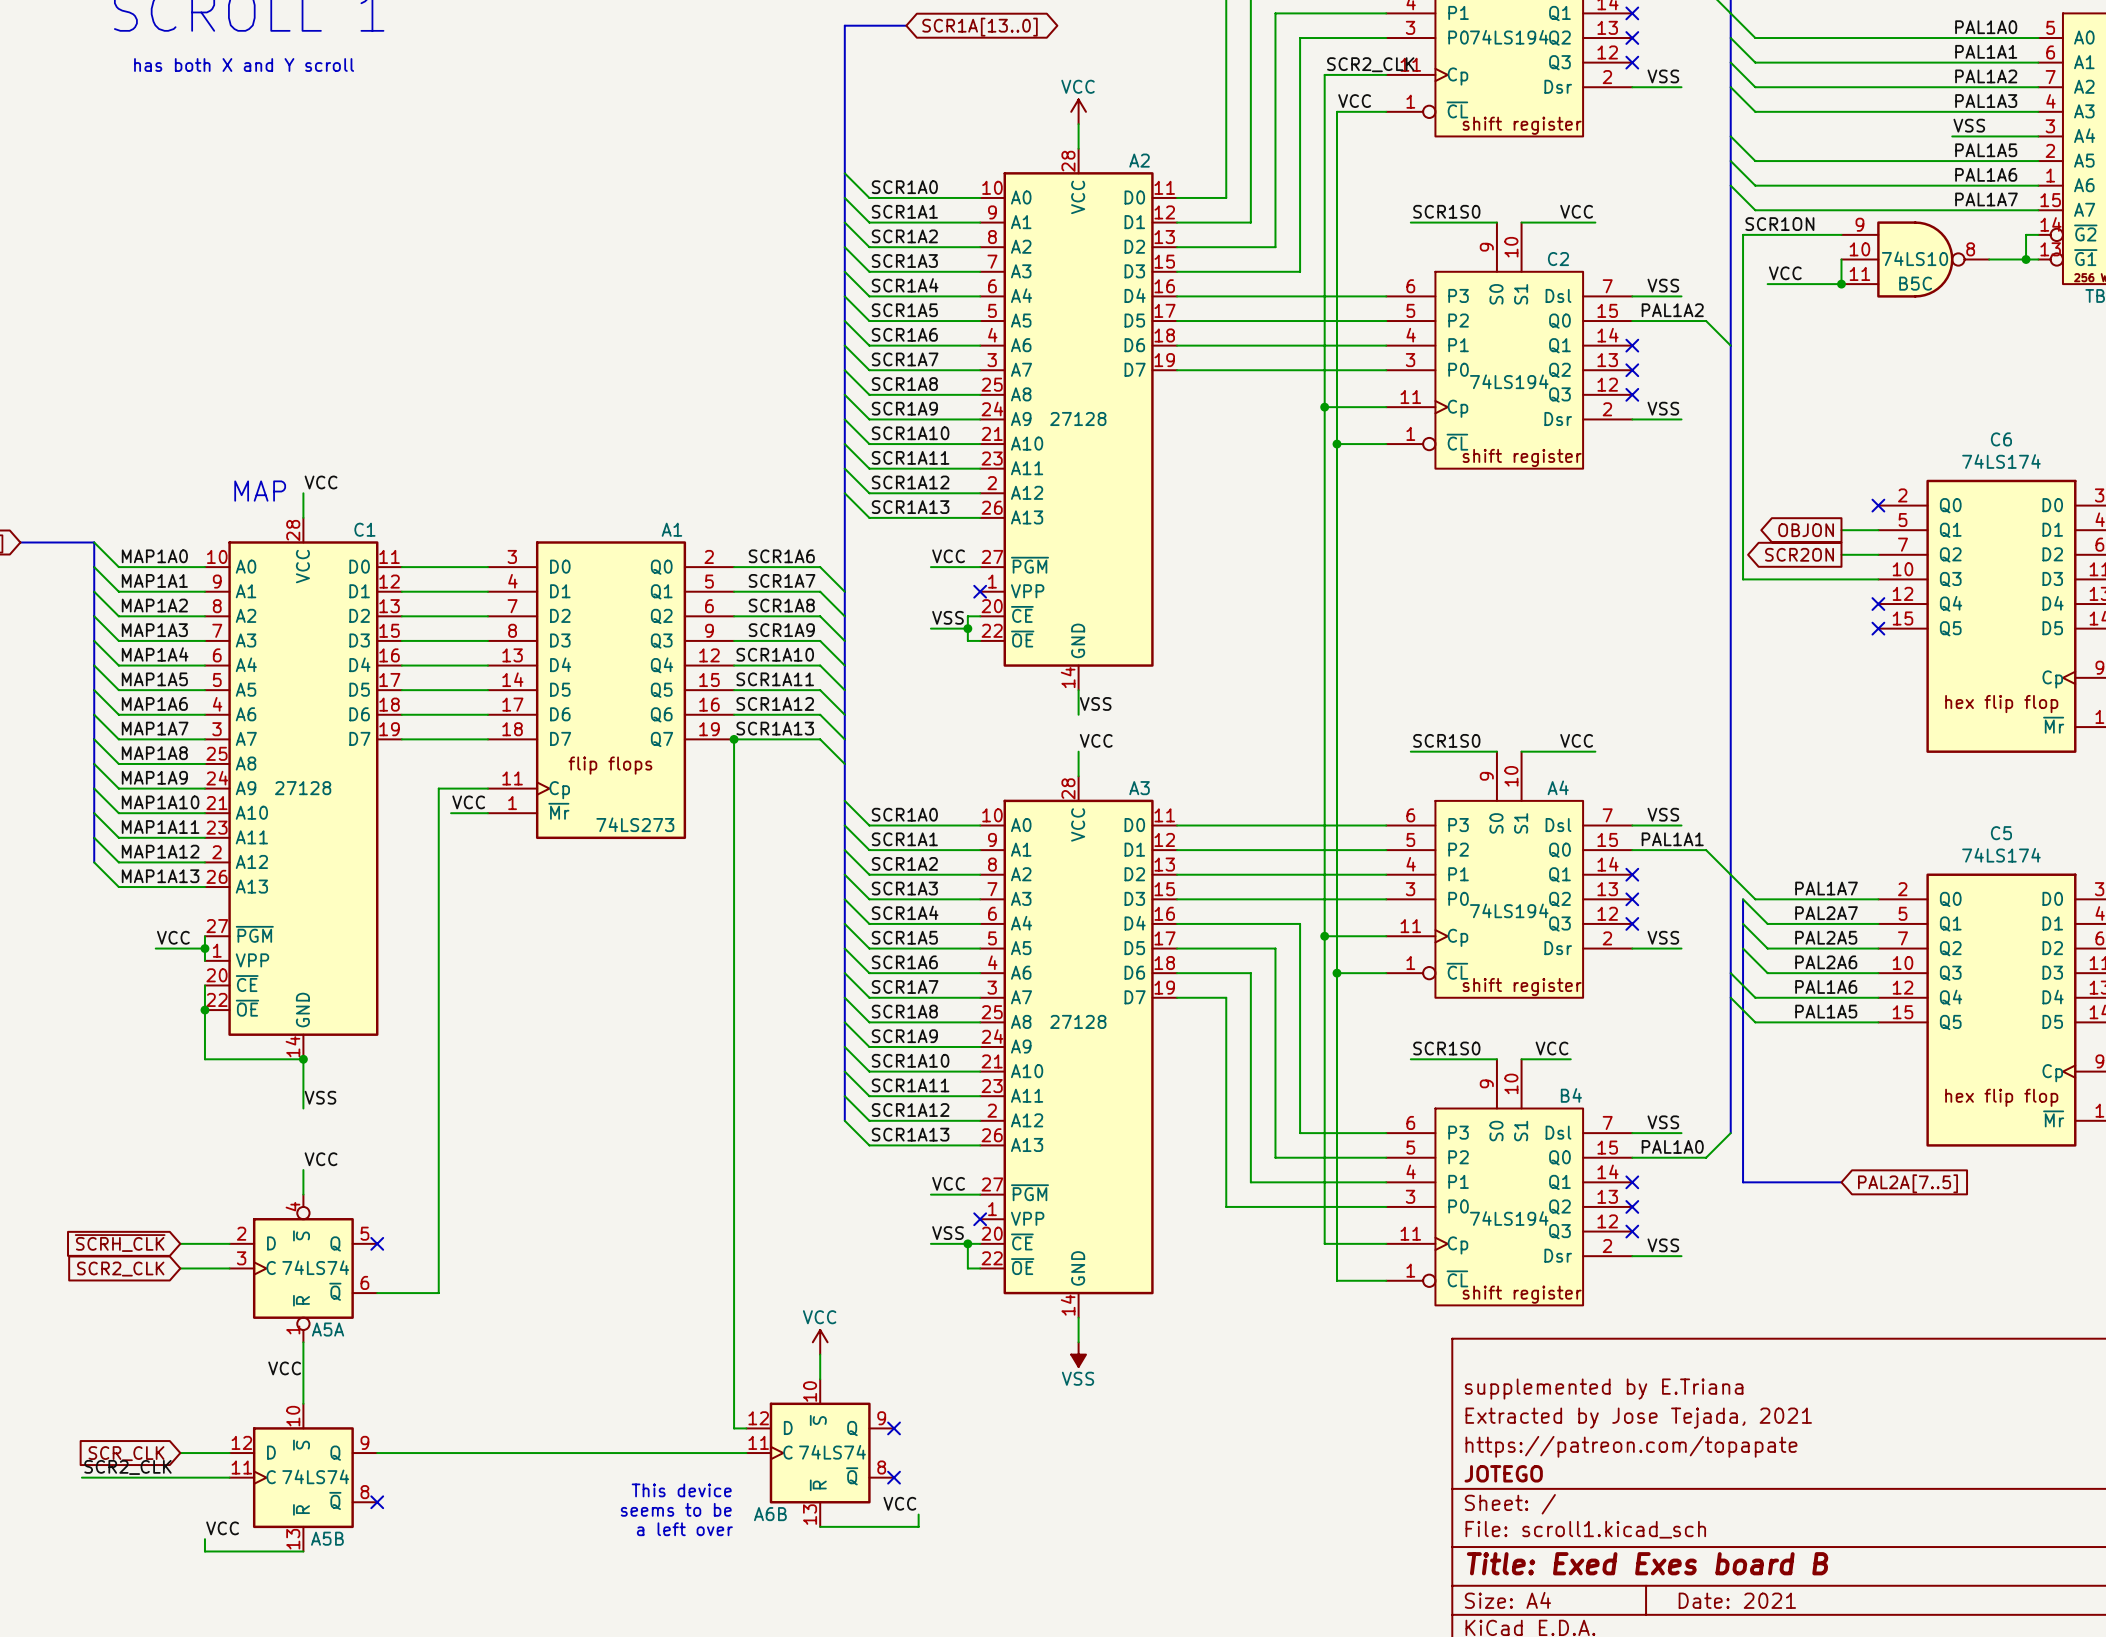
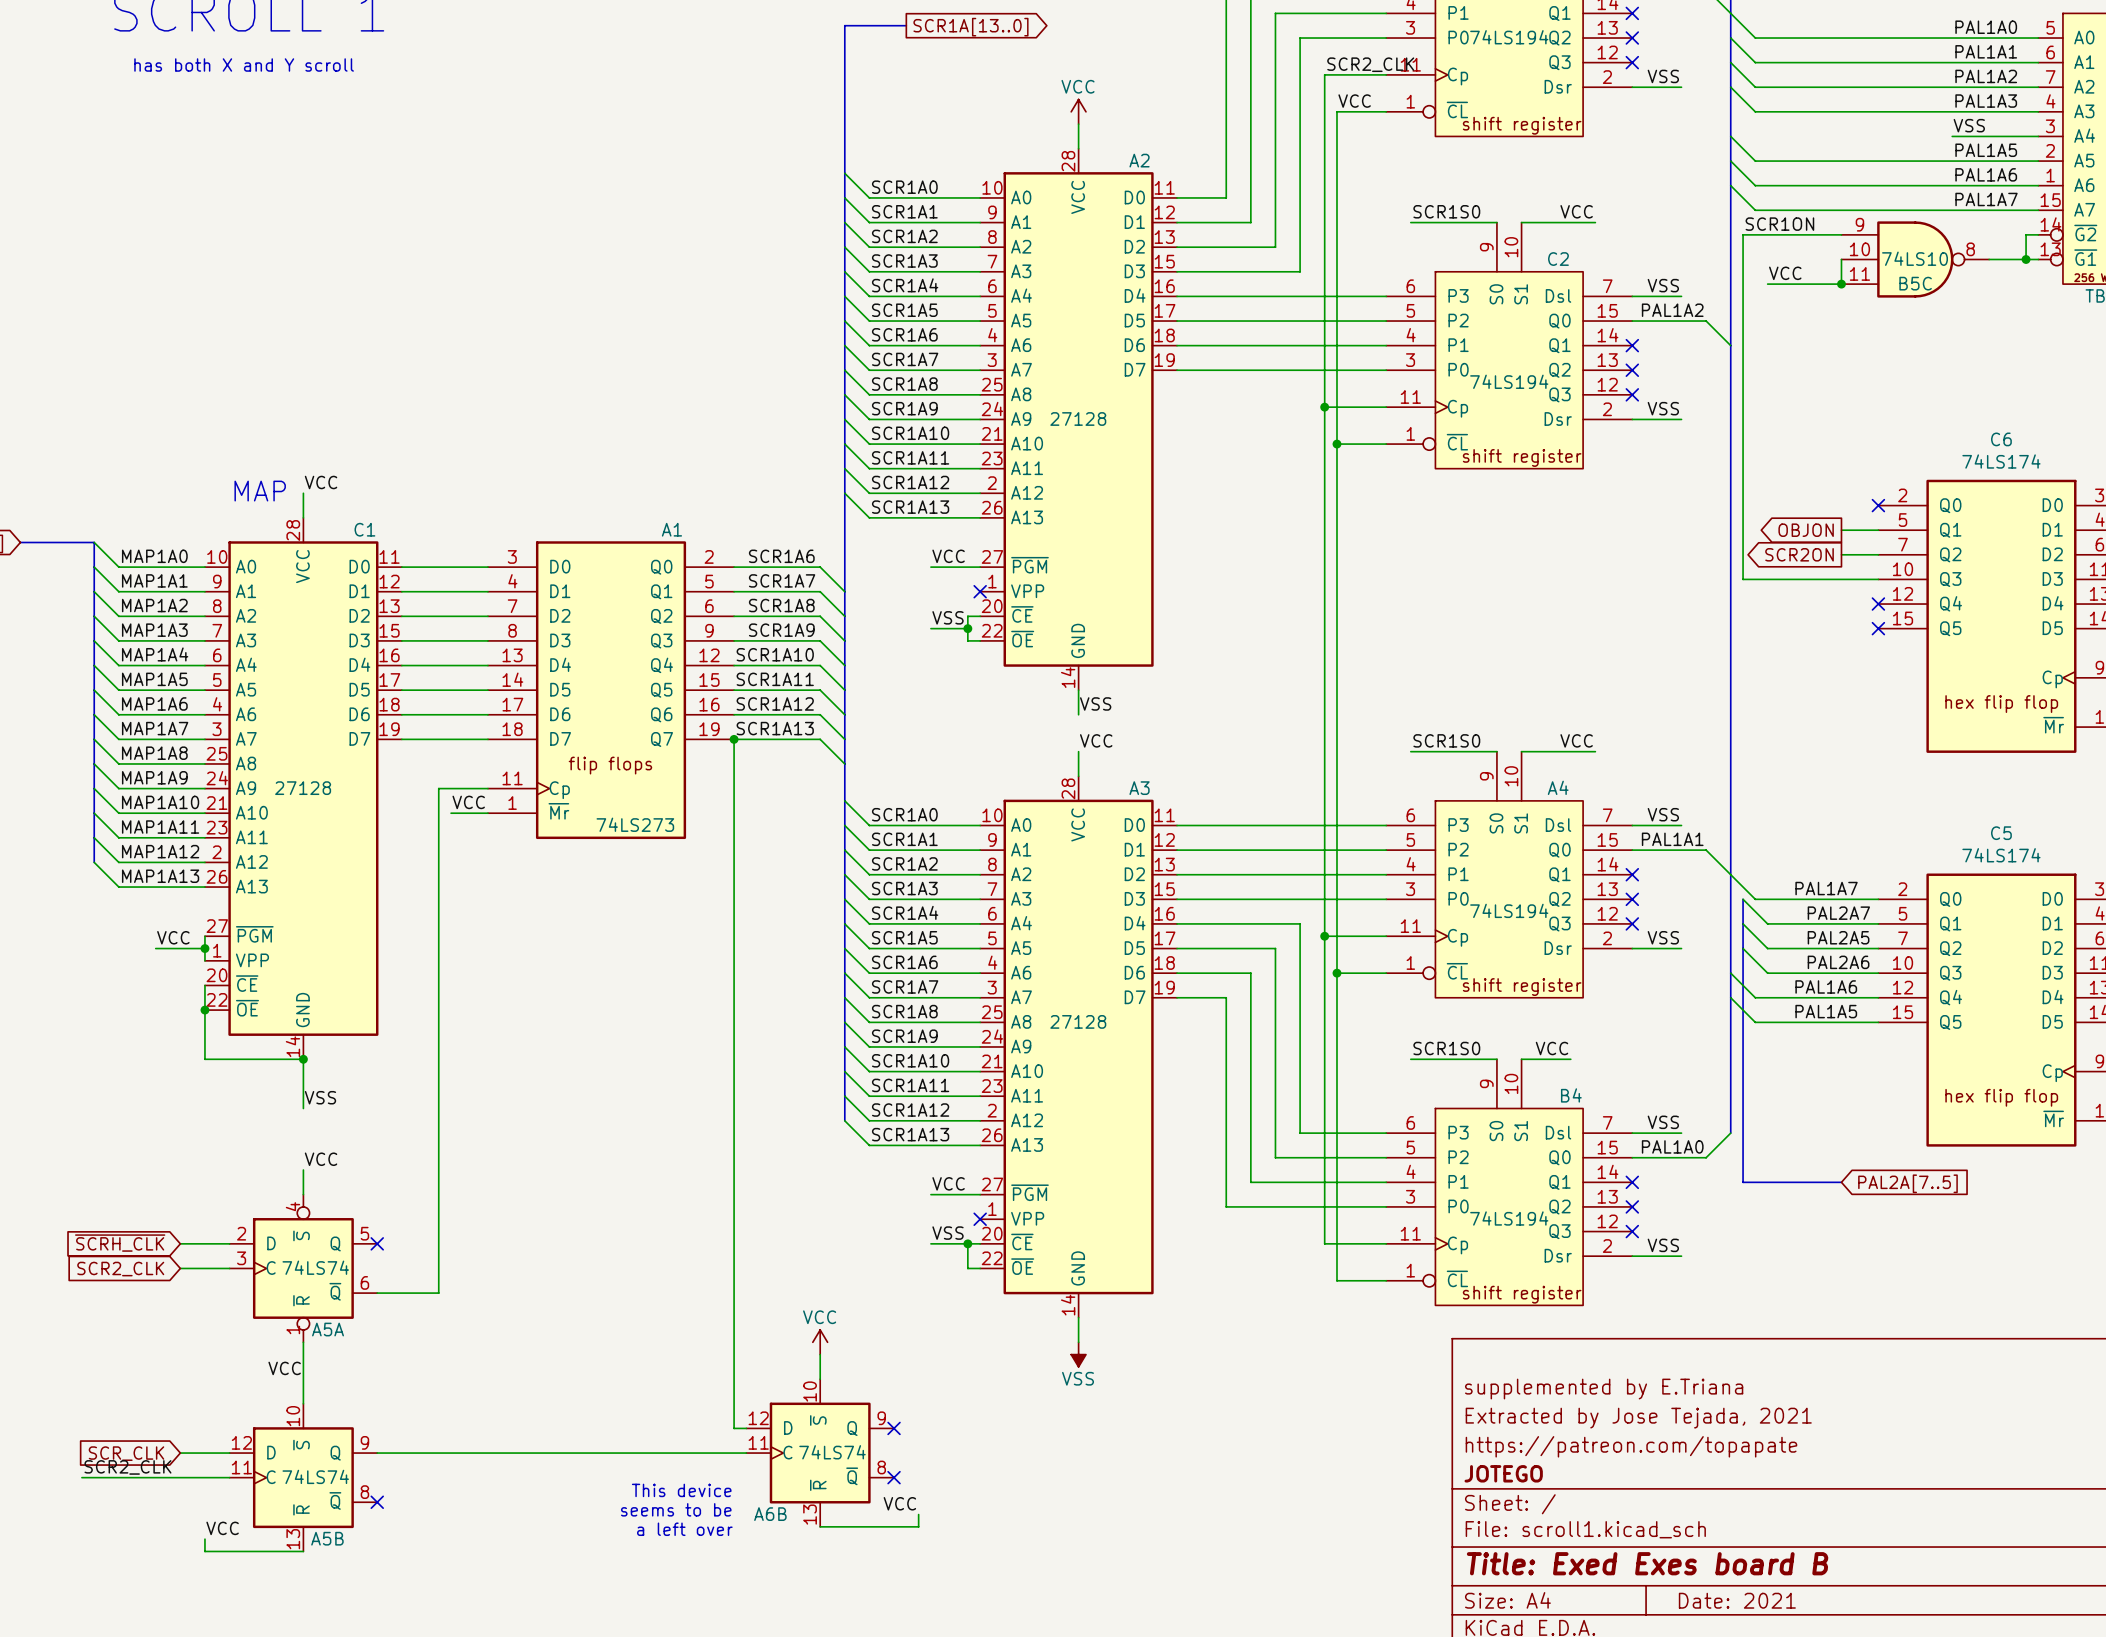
global label shape: bidirectional (980, 27) -> output (970, 27)
label position: PAL2A7 (1826, 913) -> PAL2A7 (1838, 913)
label position: PAL2A5 (1826, 937) -> PAL2A5 (1838, 937)
label position: PAL2A6 (1826, 962) -> PAL2A6 (1838, 962)

